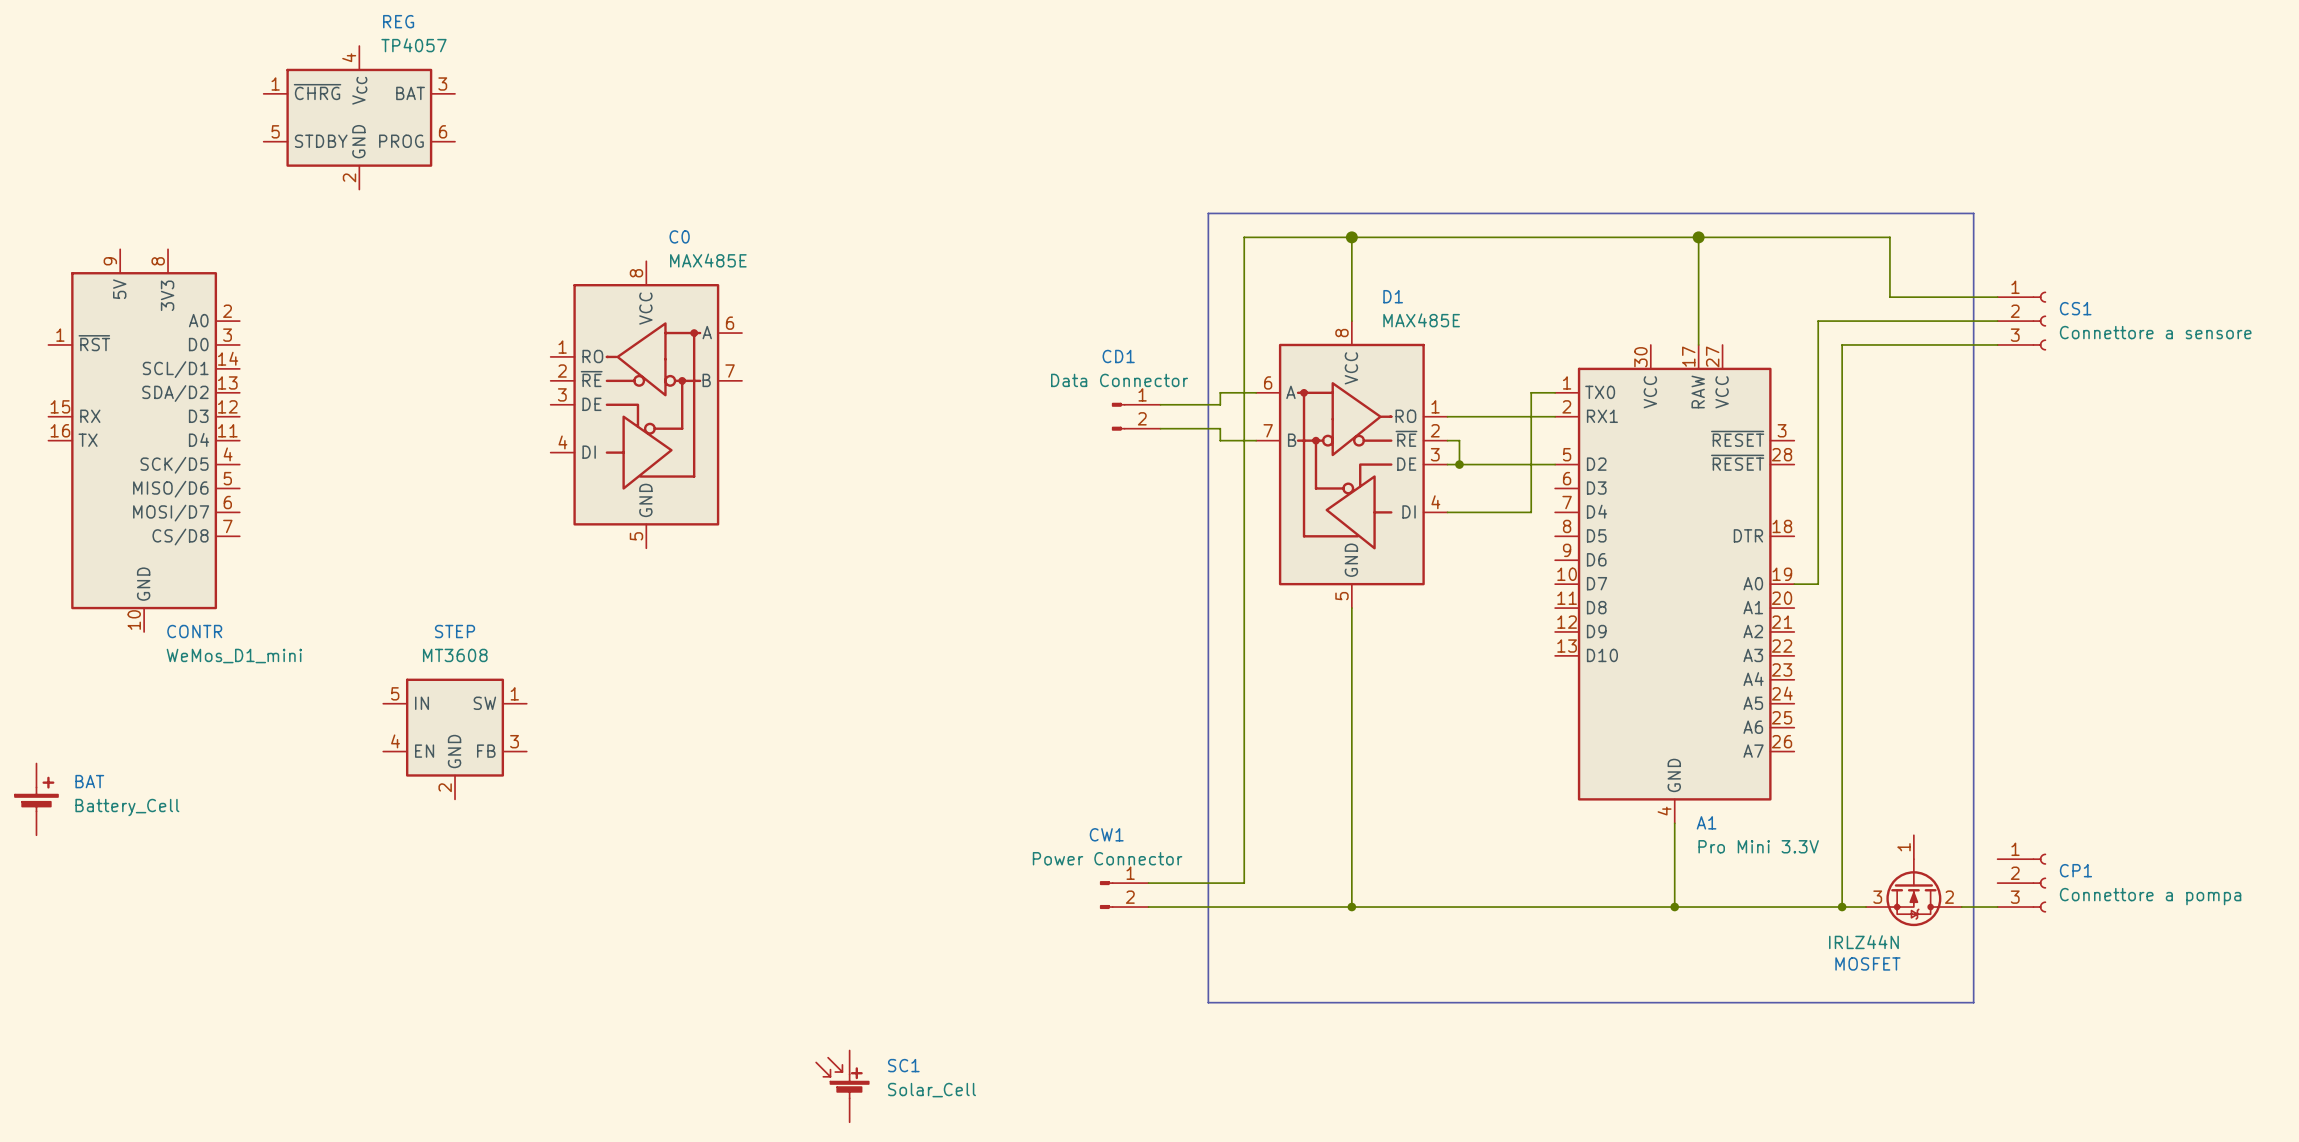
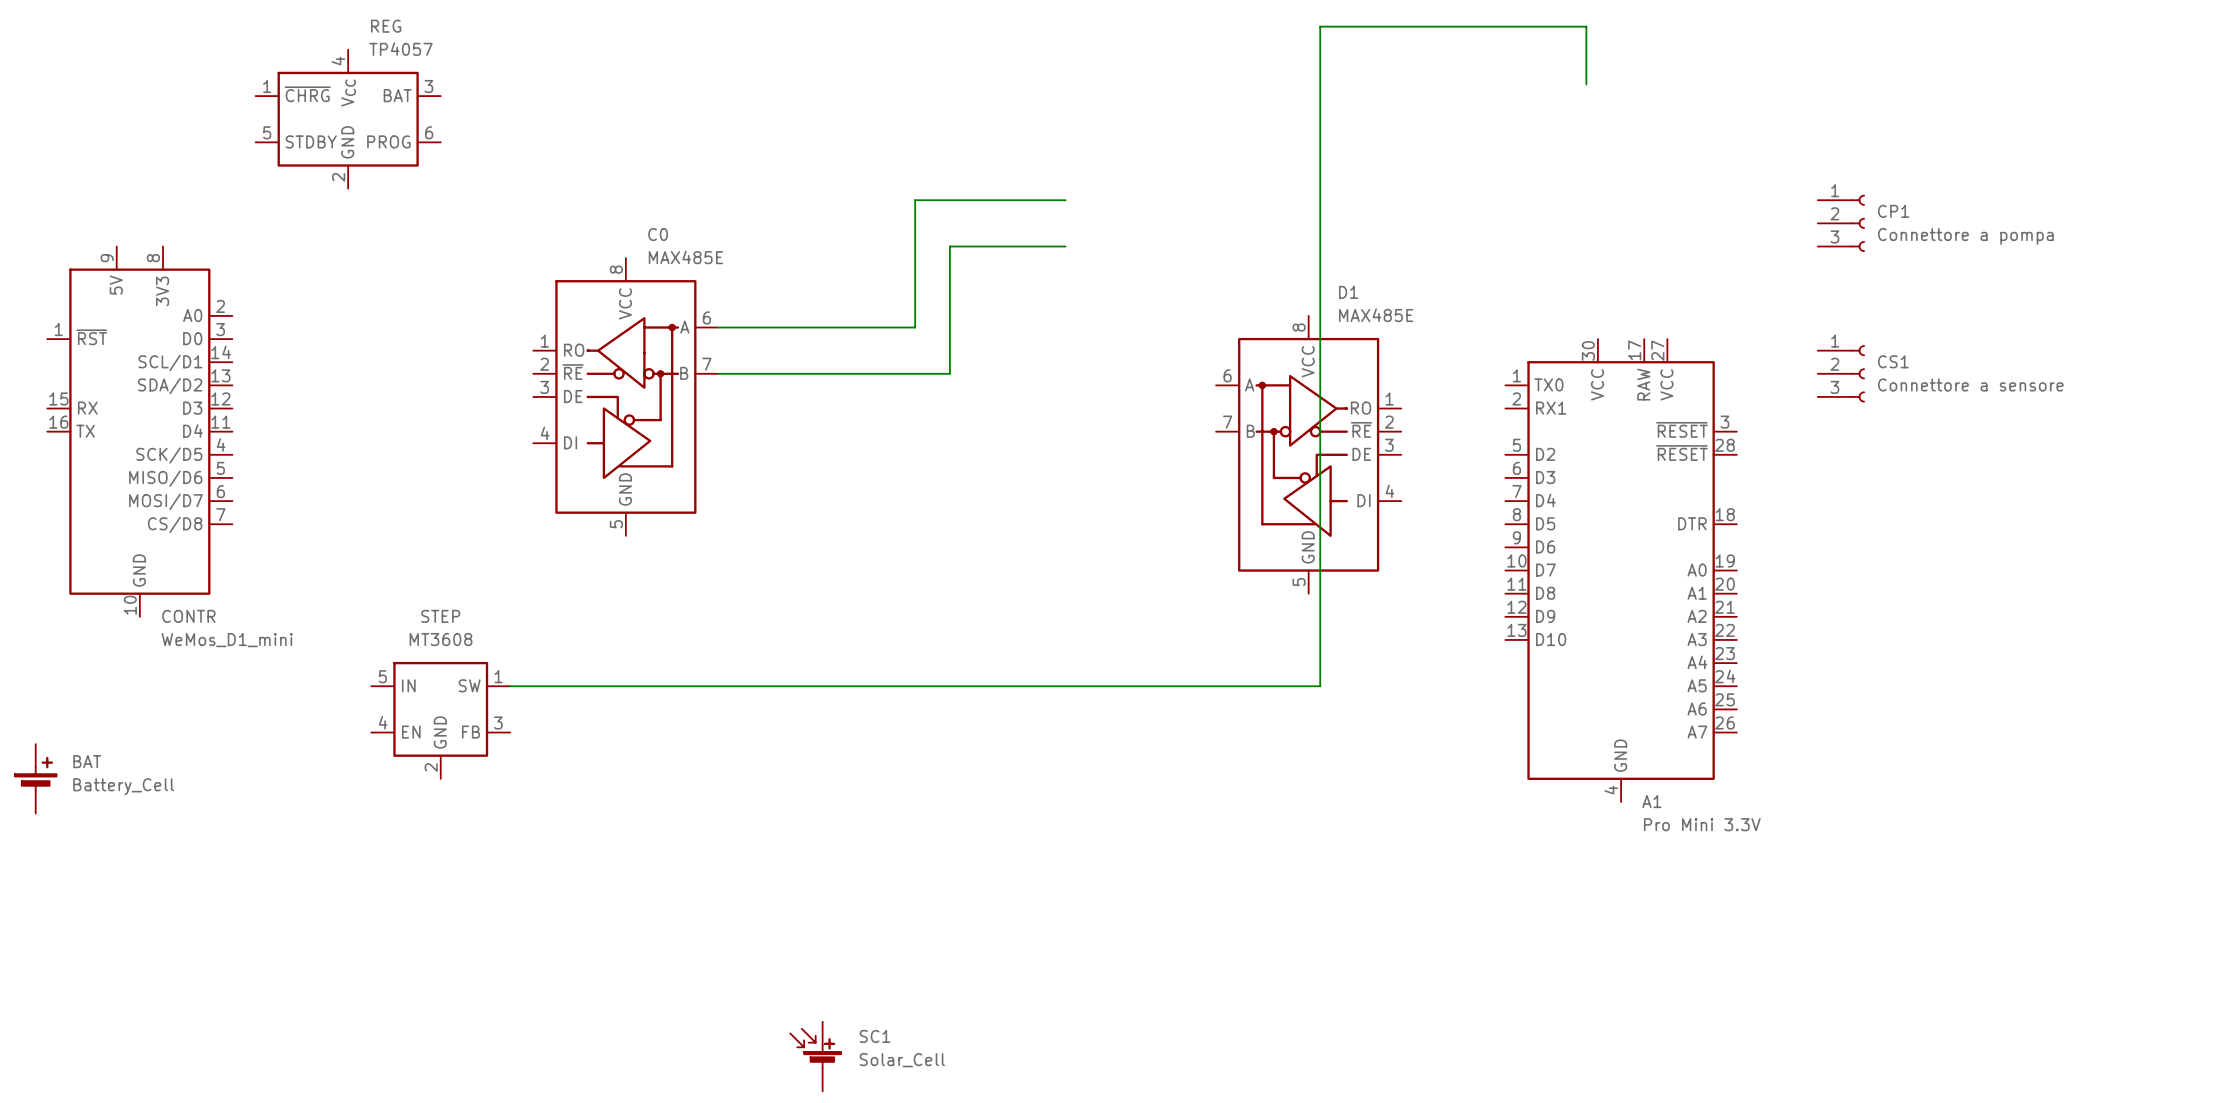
wire: none -> (1586, 84) (1586, 26) (1320, 26) (1320, 686) (510, 686)
wire: none -> (1065, 200) (915, 200) (915, 327) (718, 327)
line: (1208, 213) (1973, 213) (1973, 1002) (1208, 1002) (1208, 213) -> none
wire: (1351, 237) (1351, 321) -> none
junction: (1351, 237) -> none
wire: (1698, 237) (1698, 344) -> none
junction: (1698, 237) -> none
wire: none -> (1065, 246) (949, 246) (949, 373) (718, 373)
wire: (1997, 297) (1889, 297) (1889, 237) (1244, 237) (1244, 883) (1148, 883) -> none
wire: (1997, 321) (1818, 321) (1818, 584) (1794, 584) -> none
CS1 position: (2021, 321) -> (1841, 373)
wire: (1997, 344) (1842, 344) (1842, 907) -> none
wire: (1256, 392) (1220, 392) (1220, 404) (1160, 404) -> none
wire: (1555, 392) (1531, 392) (1531, 512) (1447, 512) -> none
CD1: Data Connector (1136, 416) -> none
wire: (1447, 416) (1555, 416) -> none
wire: (1160, 428) (1220, 428) (1220, 440) (1256, 440) -> none
wire: (1447, 440) (1459, 440) (1459, 464) -> none
wire: (1447, 464) (1555, 464) -> none
junction: (1459, 464) -> none
wire: (1351, 608) (1351, 907) -> none
wire: (1674, 823) (1674, 907) -> none
MOSFET: IRLZ44N (1913, 880) -> none
CP1 position: (2021, 883) -> (1841, 223)
CW1: Power Connector (1124, 895) -> none
wire: (1148, 907) (1866, 907) -> none
junction: (1351, 907) -> none
junction: (1674, 907) -> none
junction: (1842, 907) -> none
wire: (1961, 907) (1997, 907) -> none

